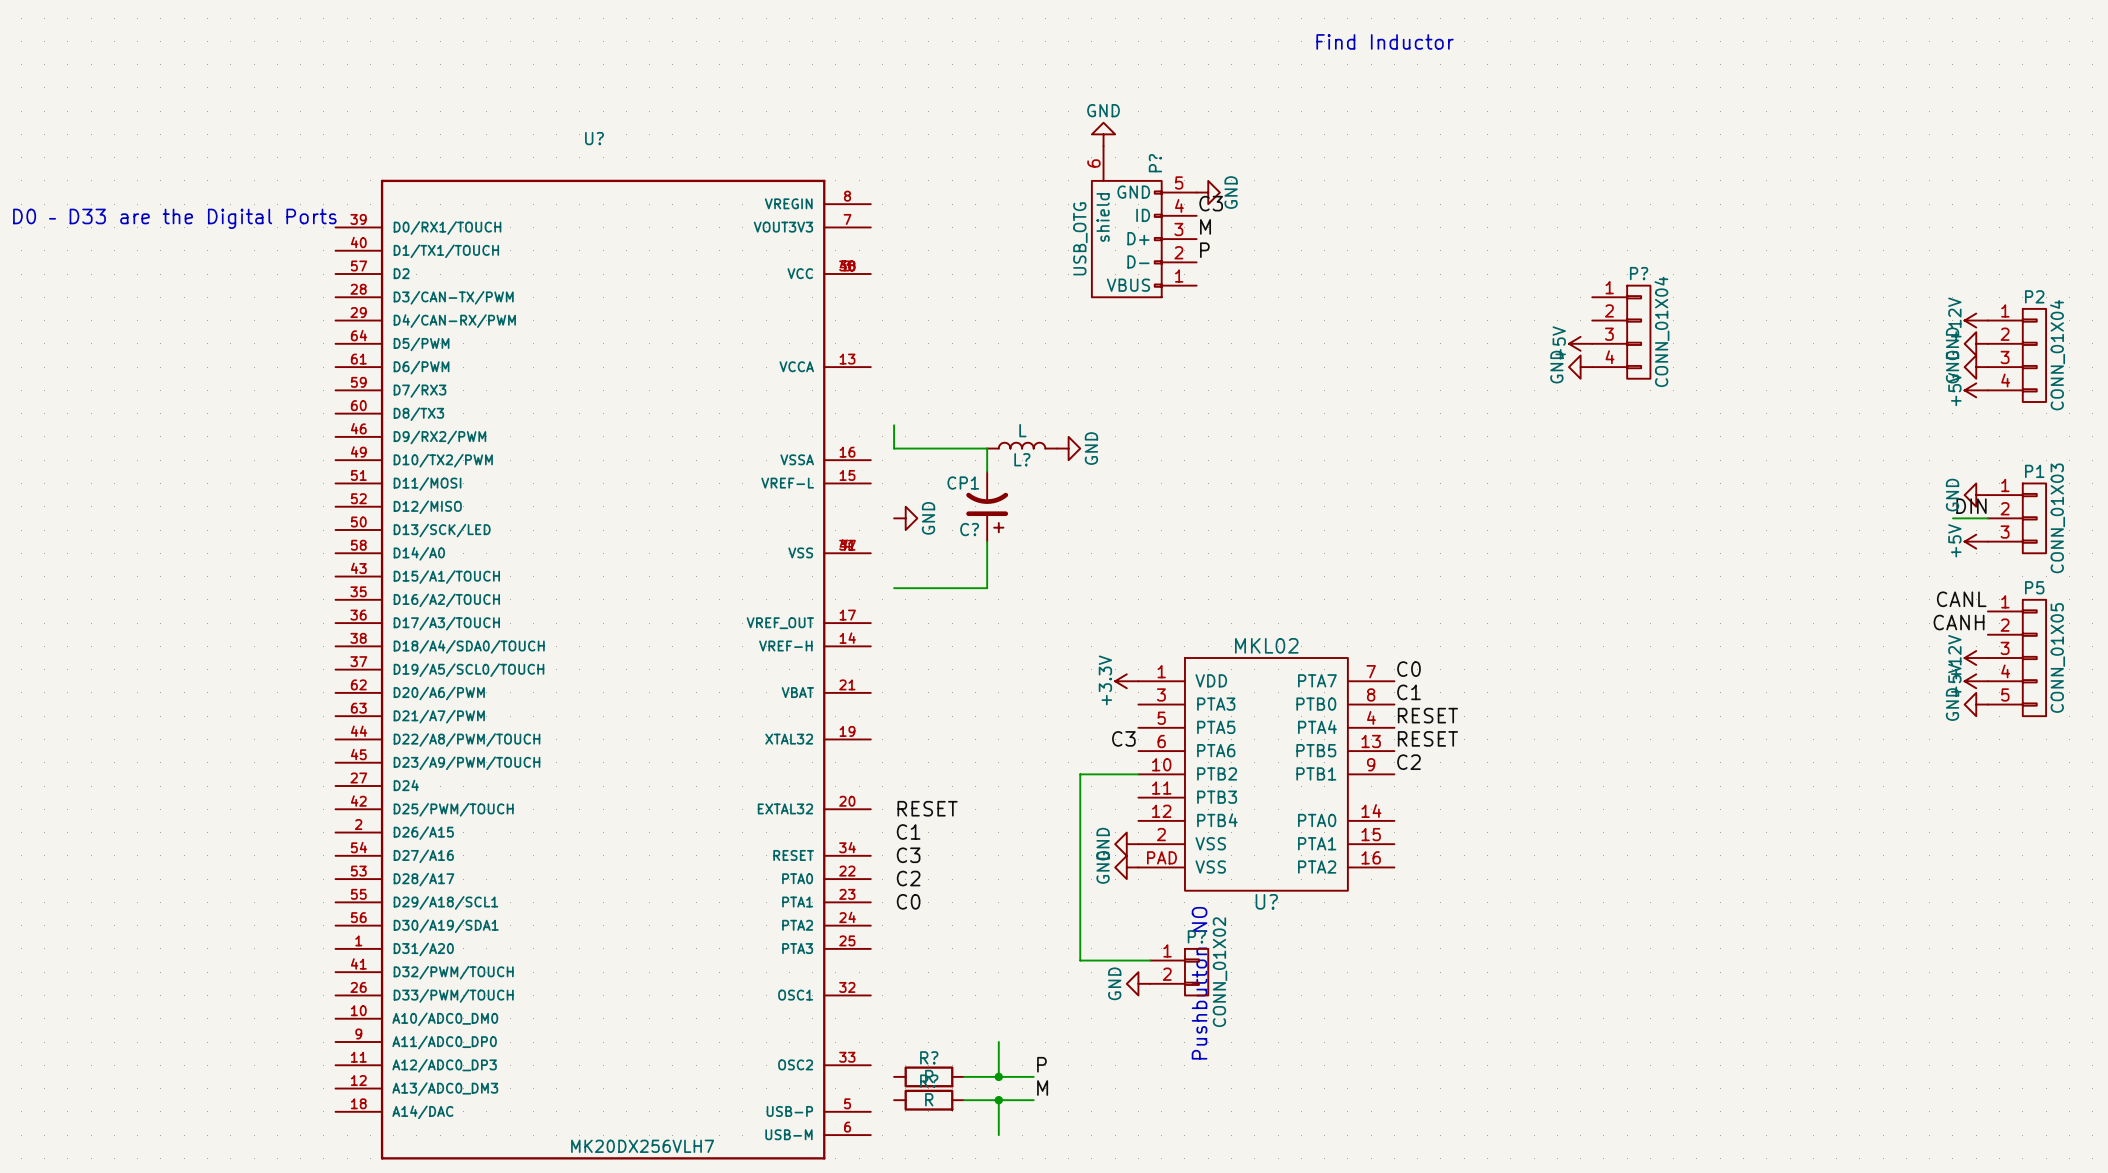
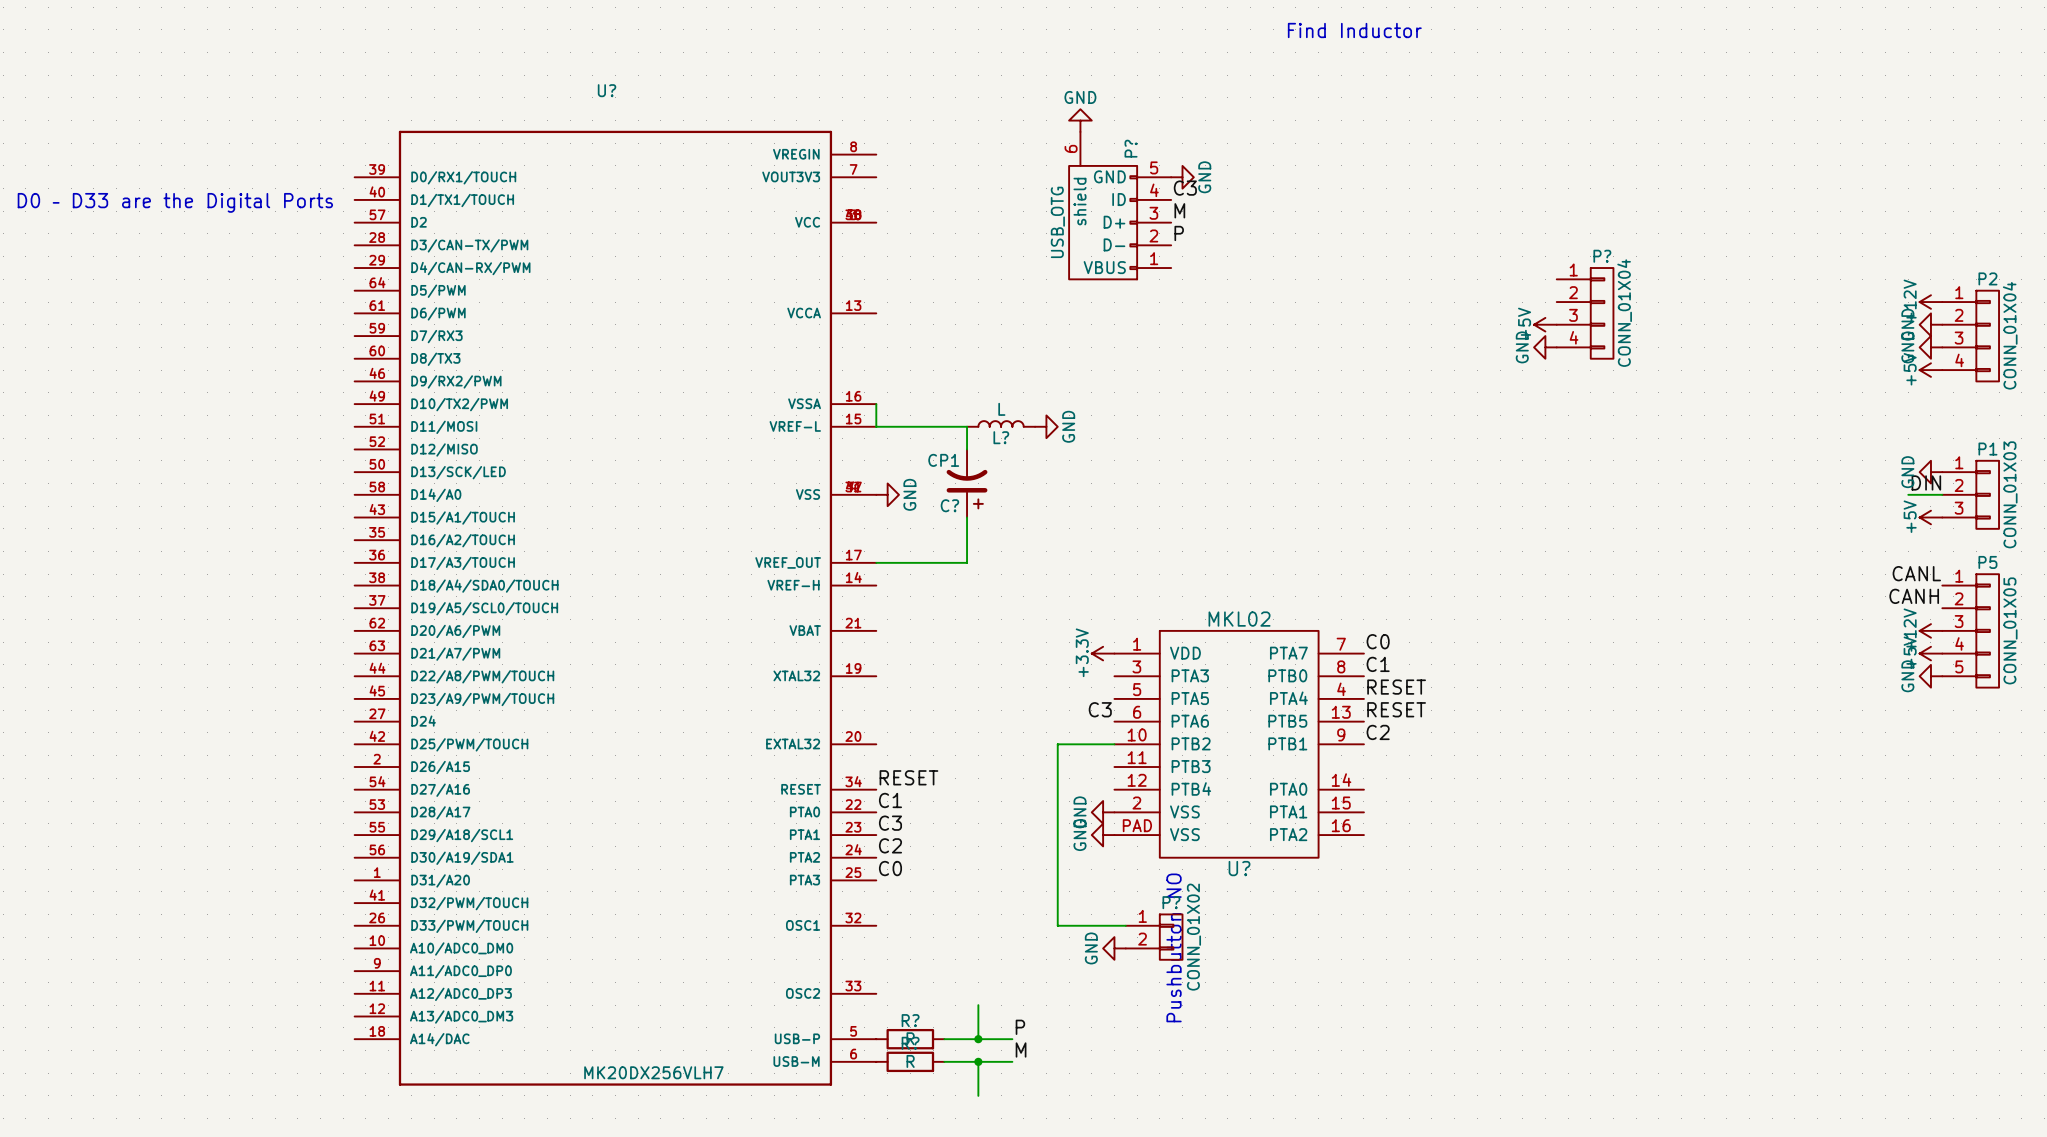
U? position: (603, 669) -> (615, 608)

